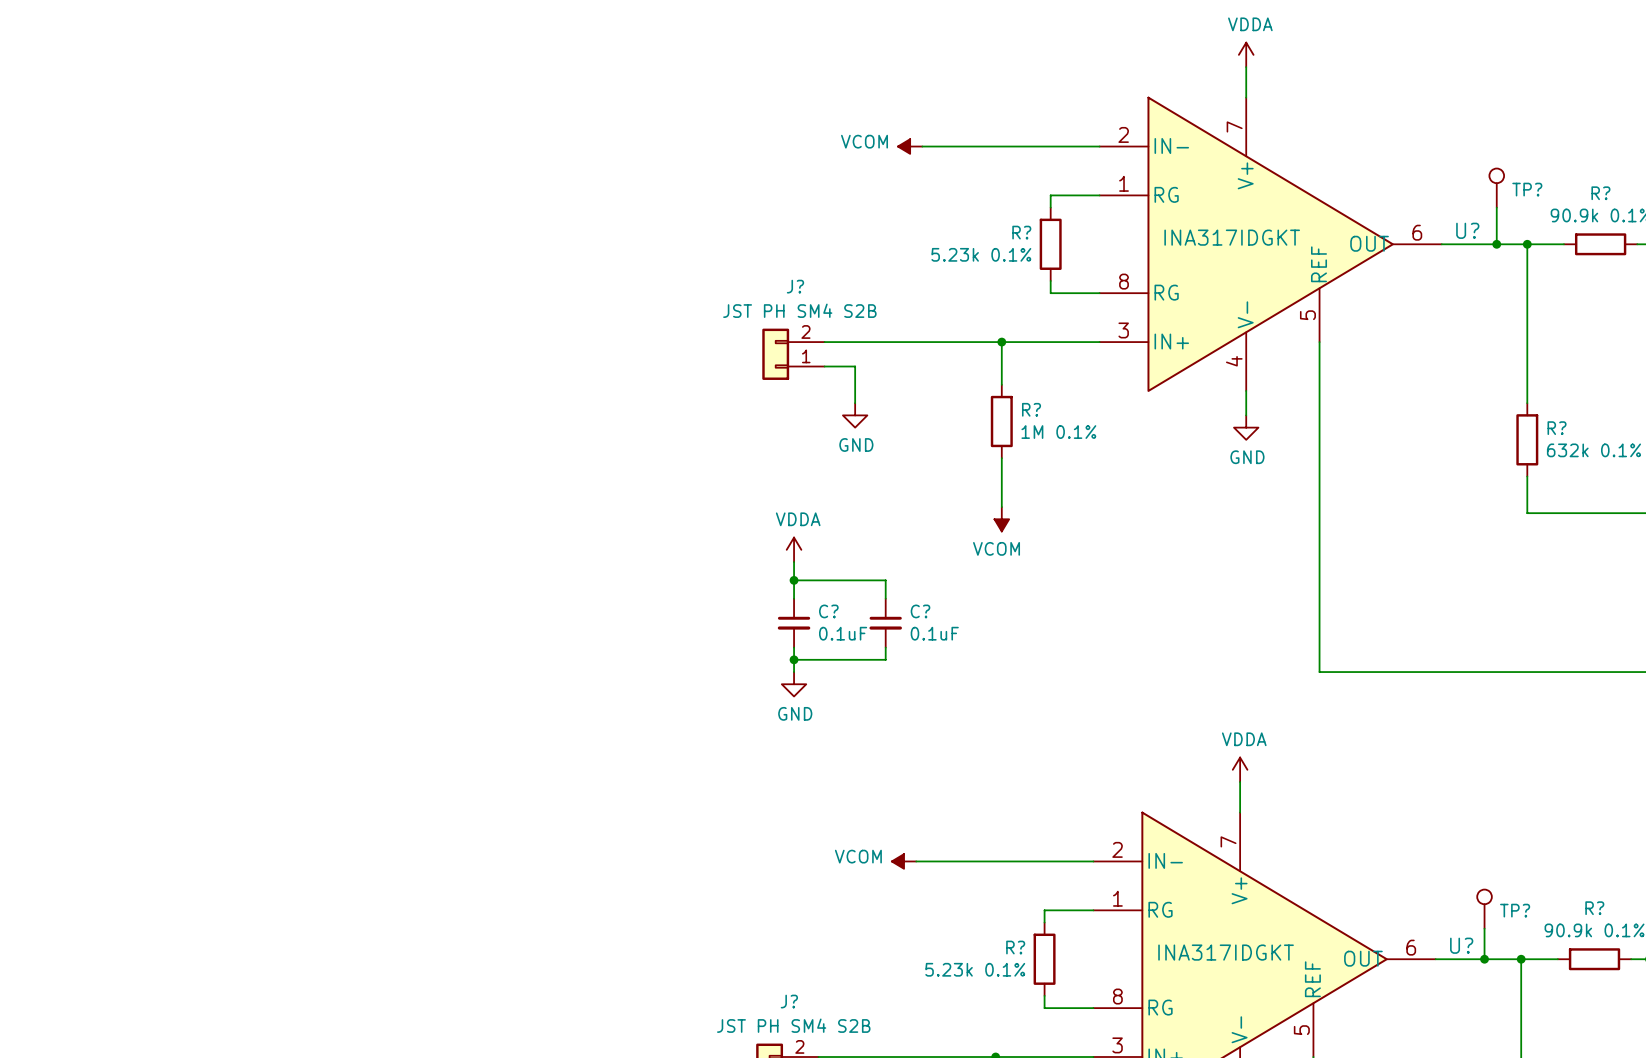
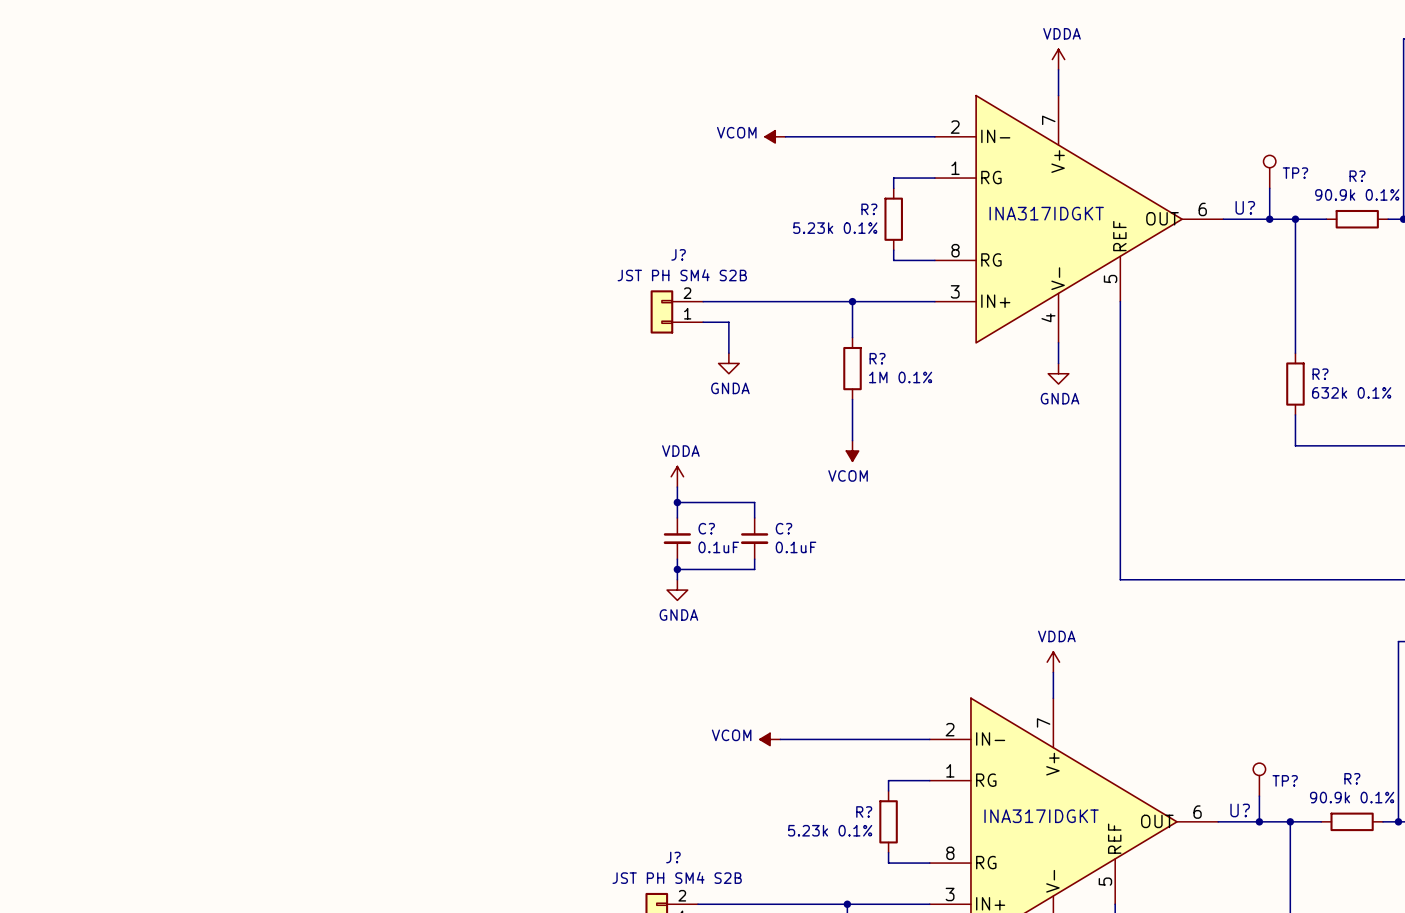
power symbol: GND (855, 415) -> GNDA (728, 363)
power symbol: GND (1246, 427) -> GNDA (1058, 373)
power symbol: GND (794, 684) -> GNDA (677, 590)

